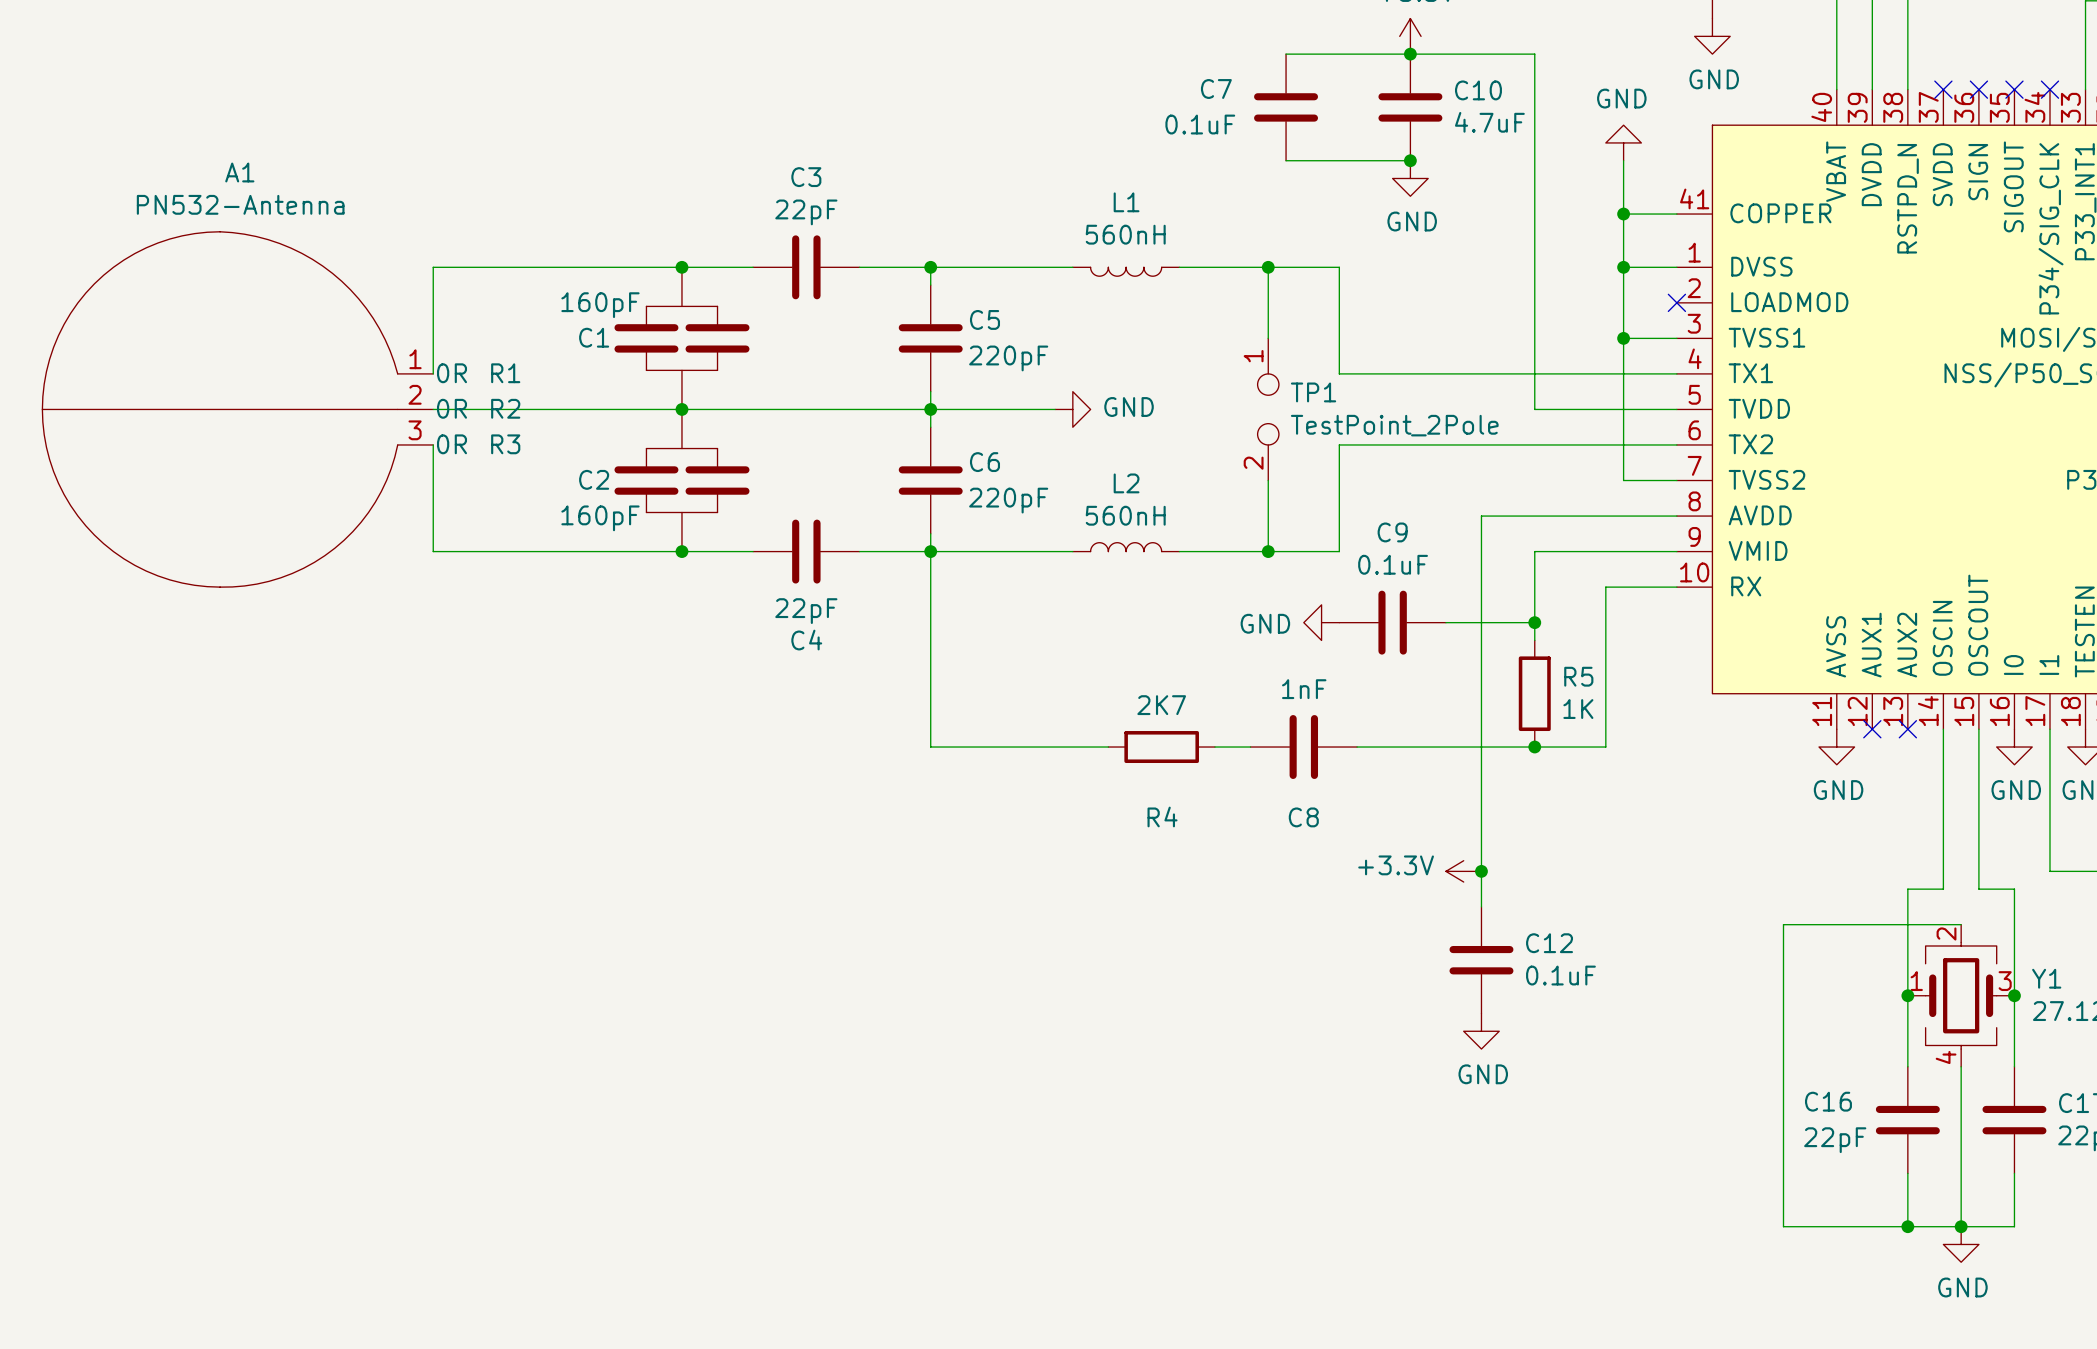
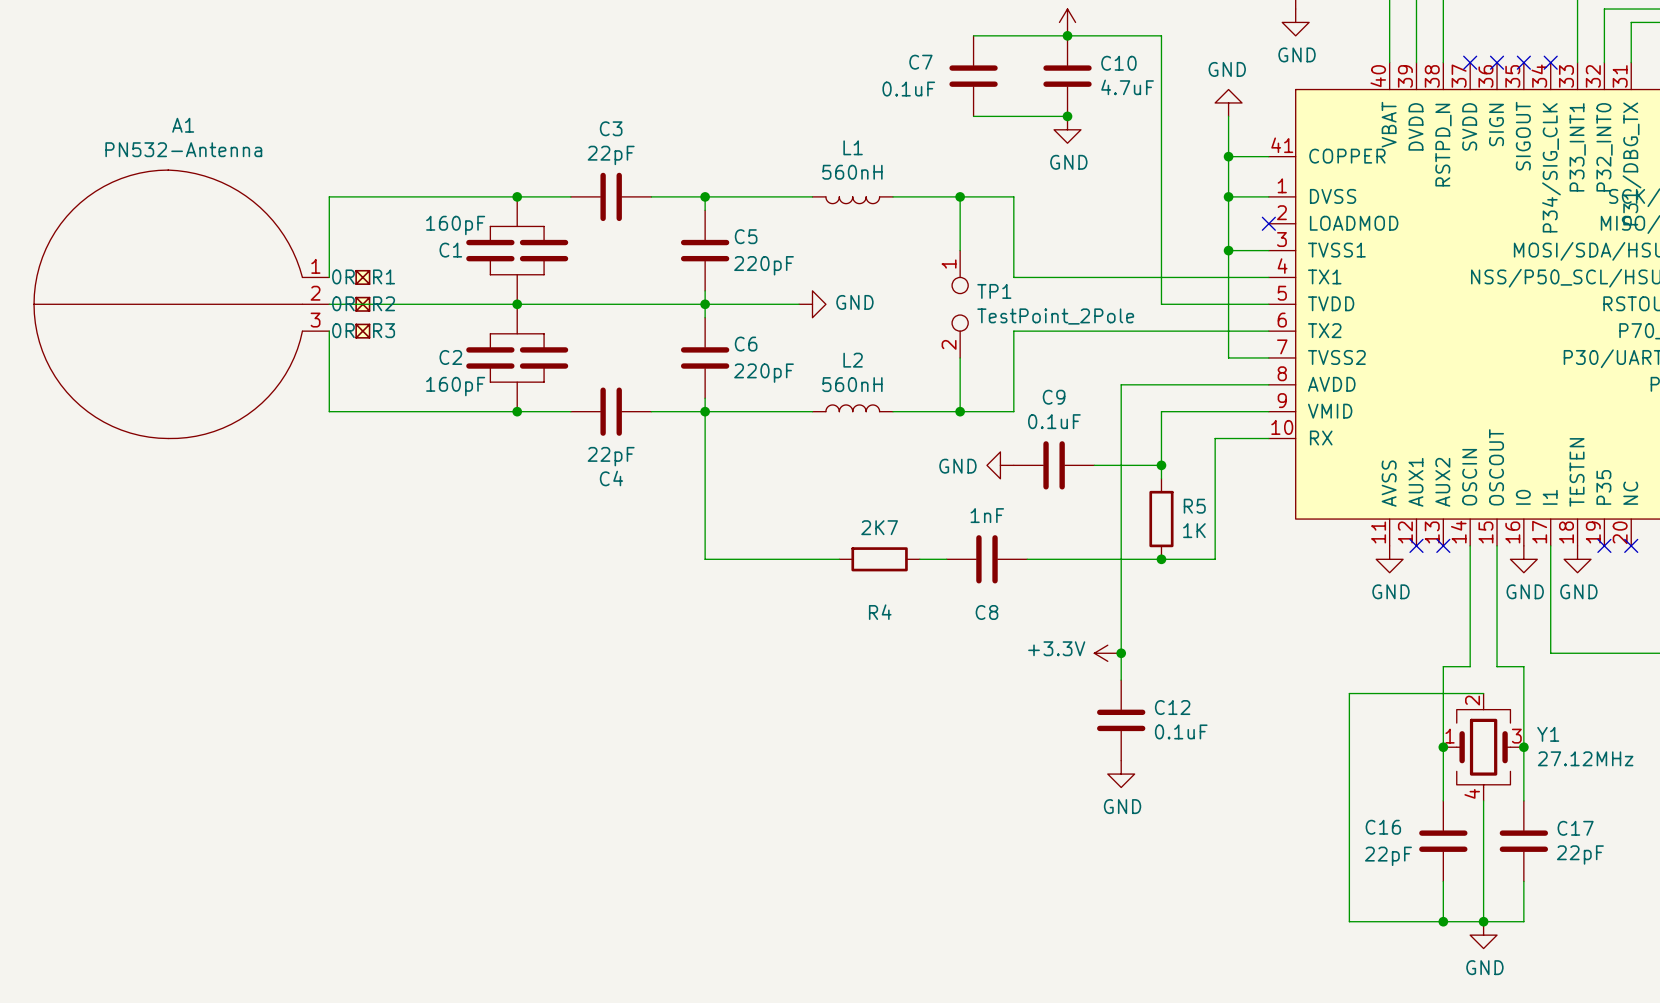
R1 symbol: [436, 363, 521, 384] -> [355, 269, 371, 285]
R2 symbol: [436, 398, 521, 419] -> [355, 296, 371, 312]
R3 symbol: [436, 434, 521, 455] -> [355, 323, 371, 339]

